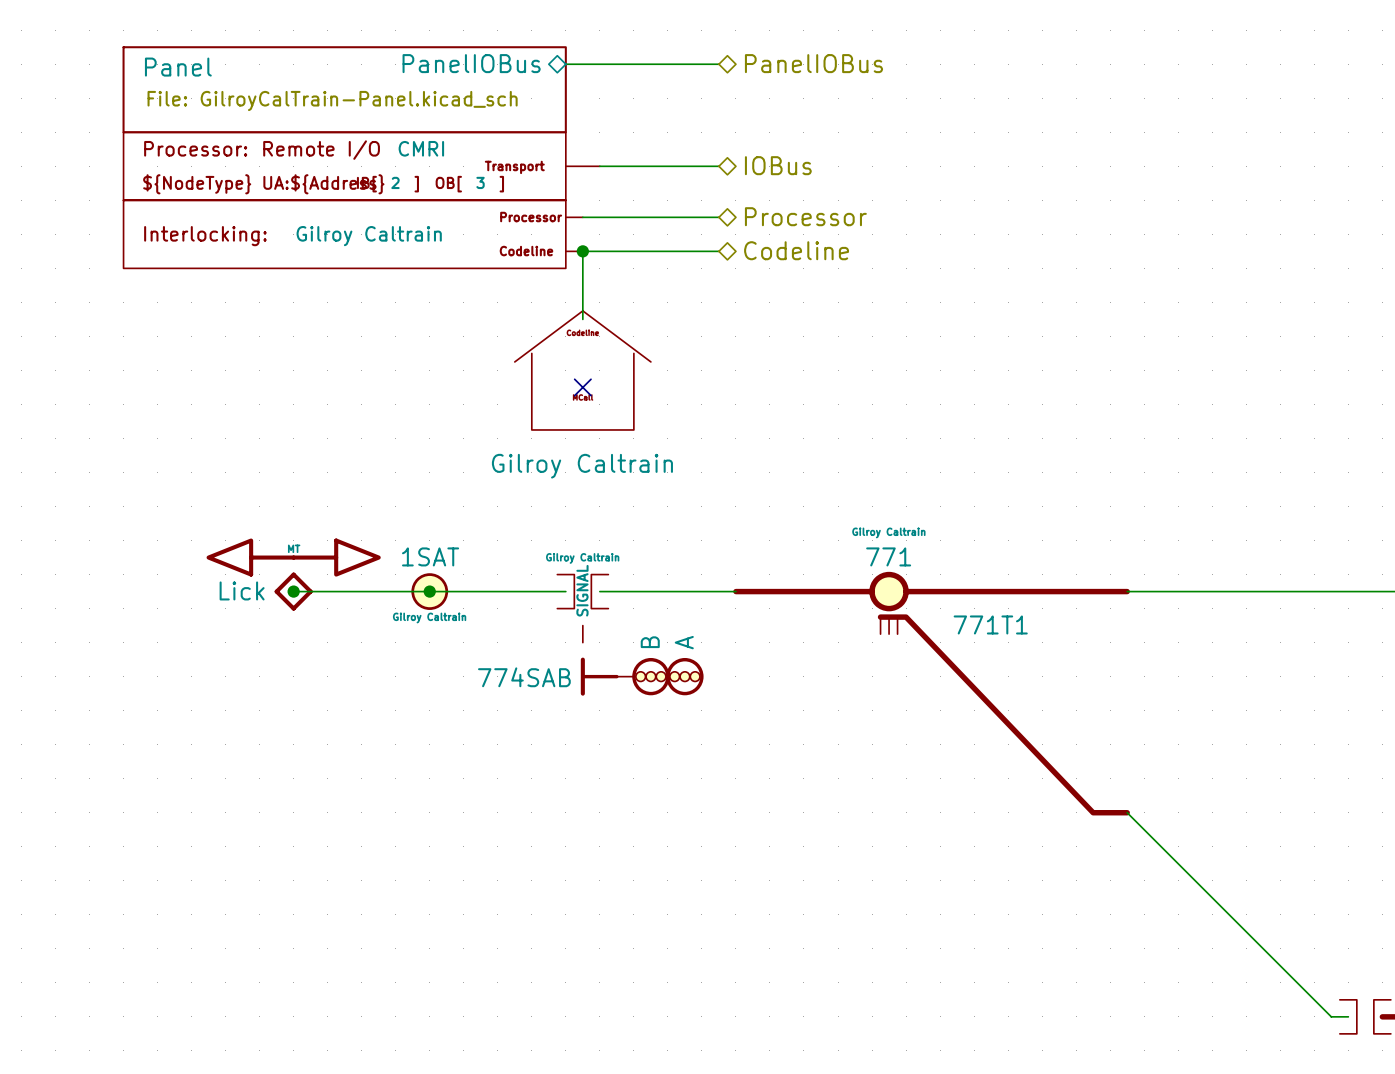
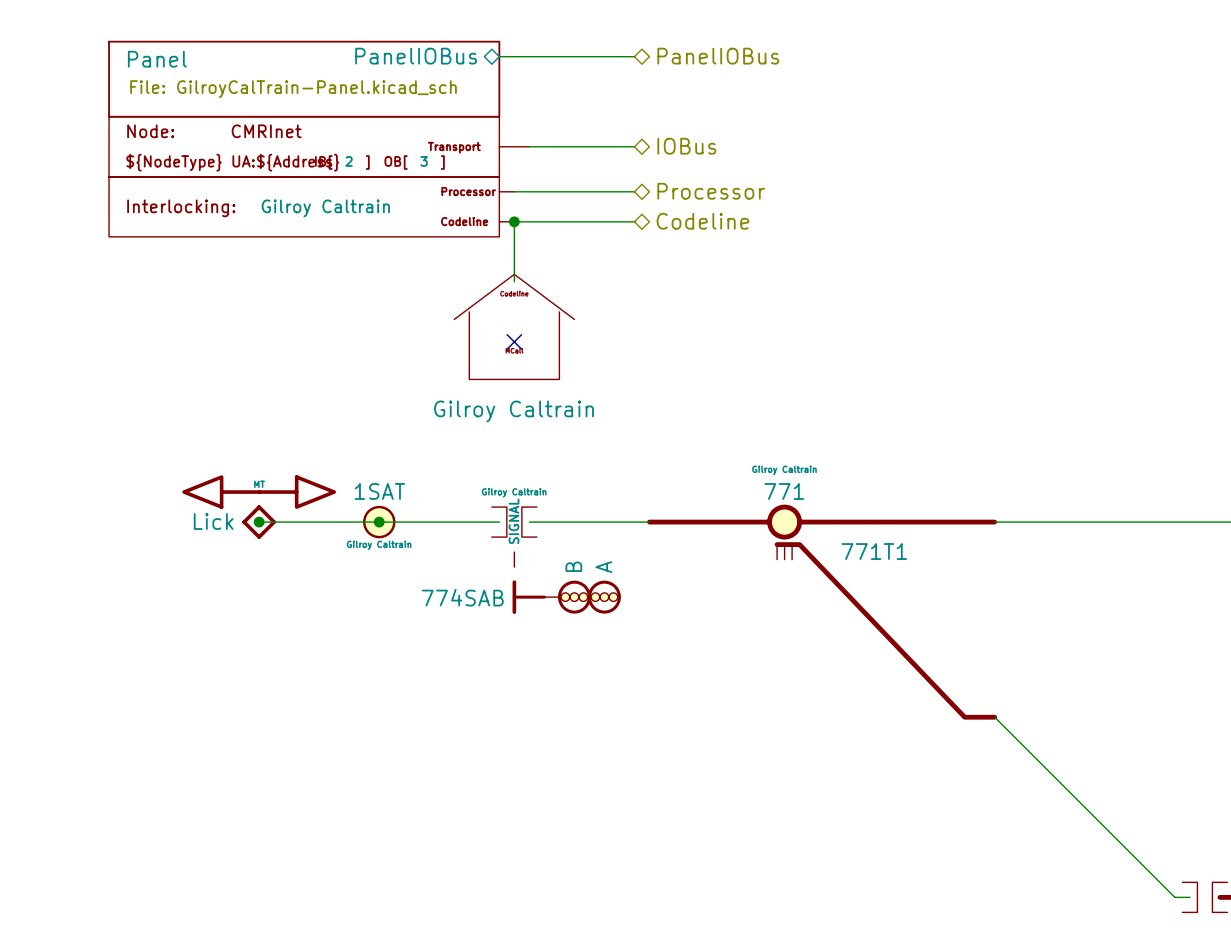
part text: Processor: (195, 148) -> Node: (150, 131)
part text: CMRI (421, 148) -> none
part text: Remote I/O (321, 150) -> CMRInet (266, 131)

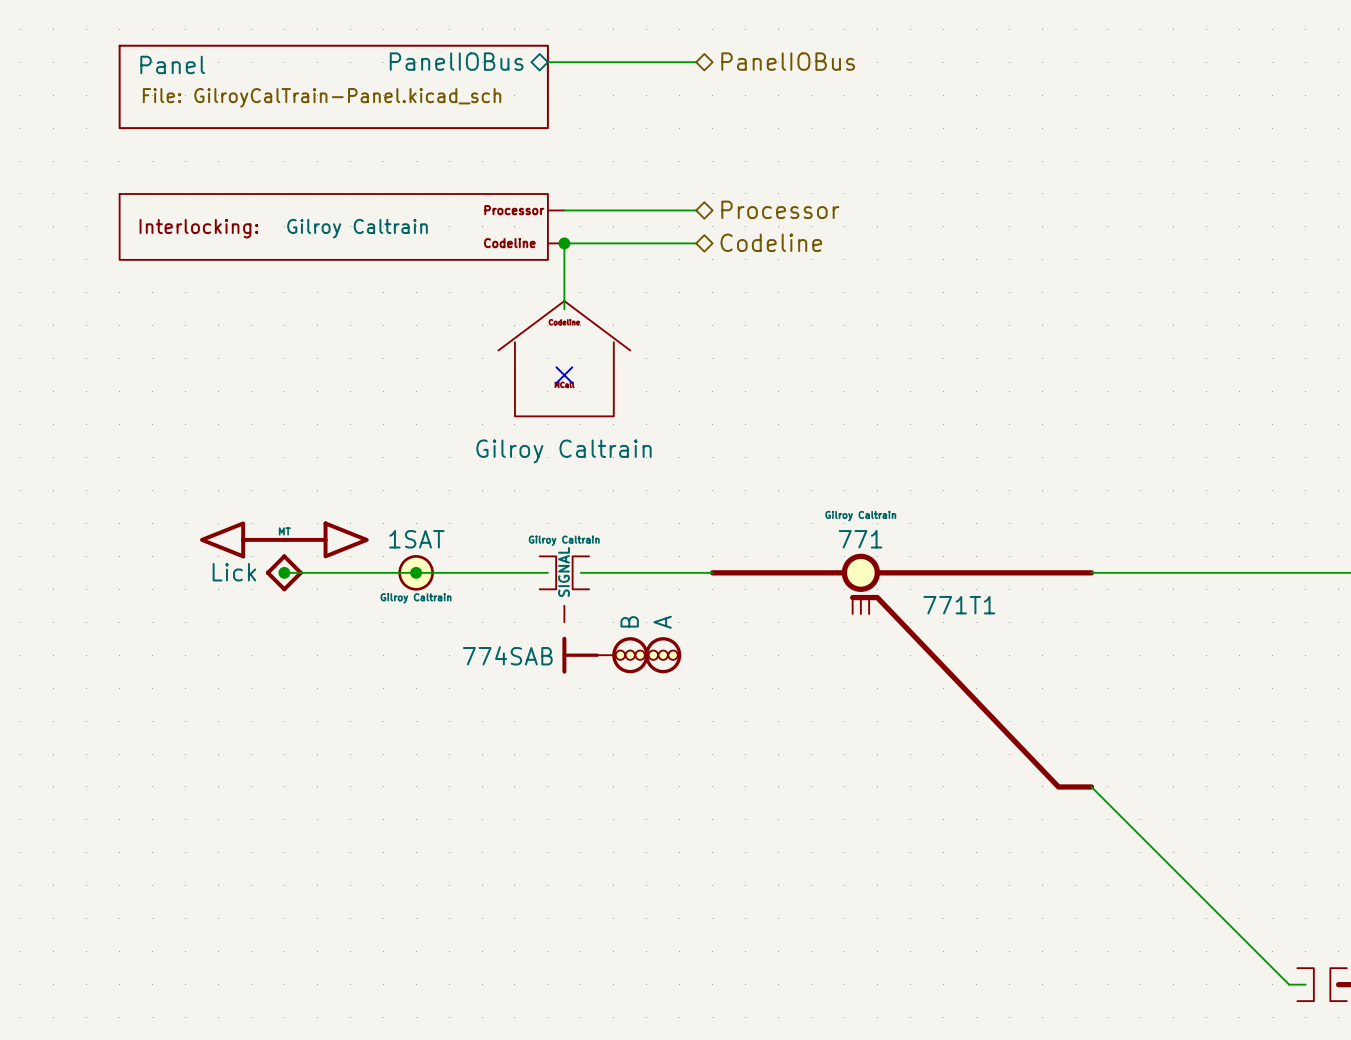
part: (319, 146) -> none
wire: (529, 146) (634, 146) -> none
hierarchical label: IOBus (686, 146) -> none

